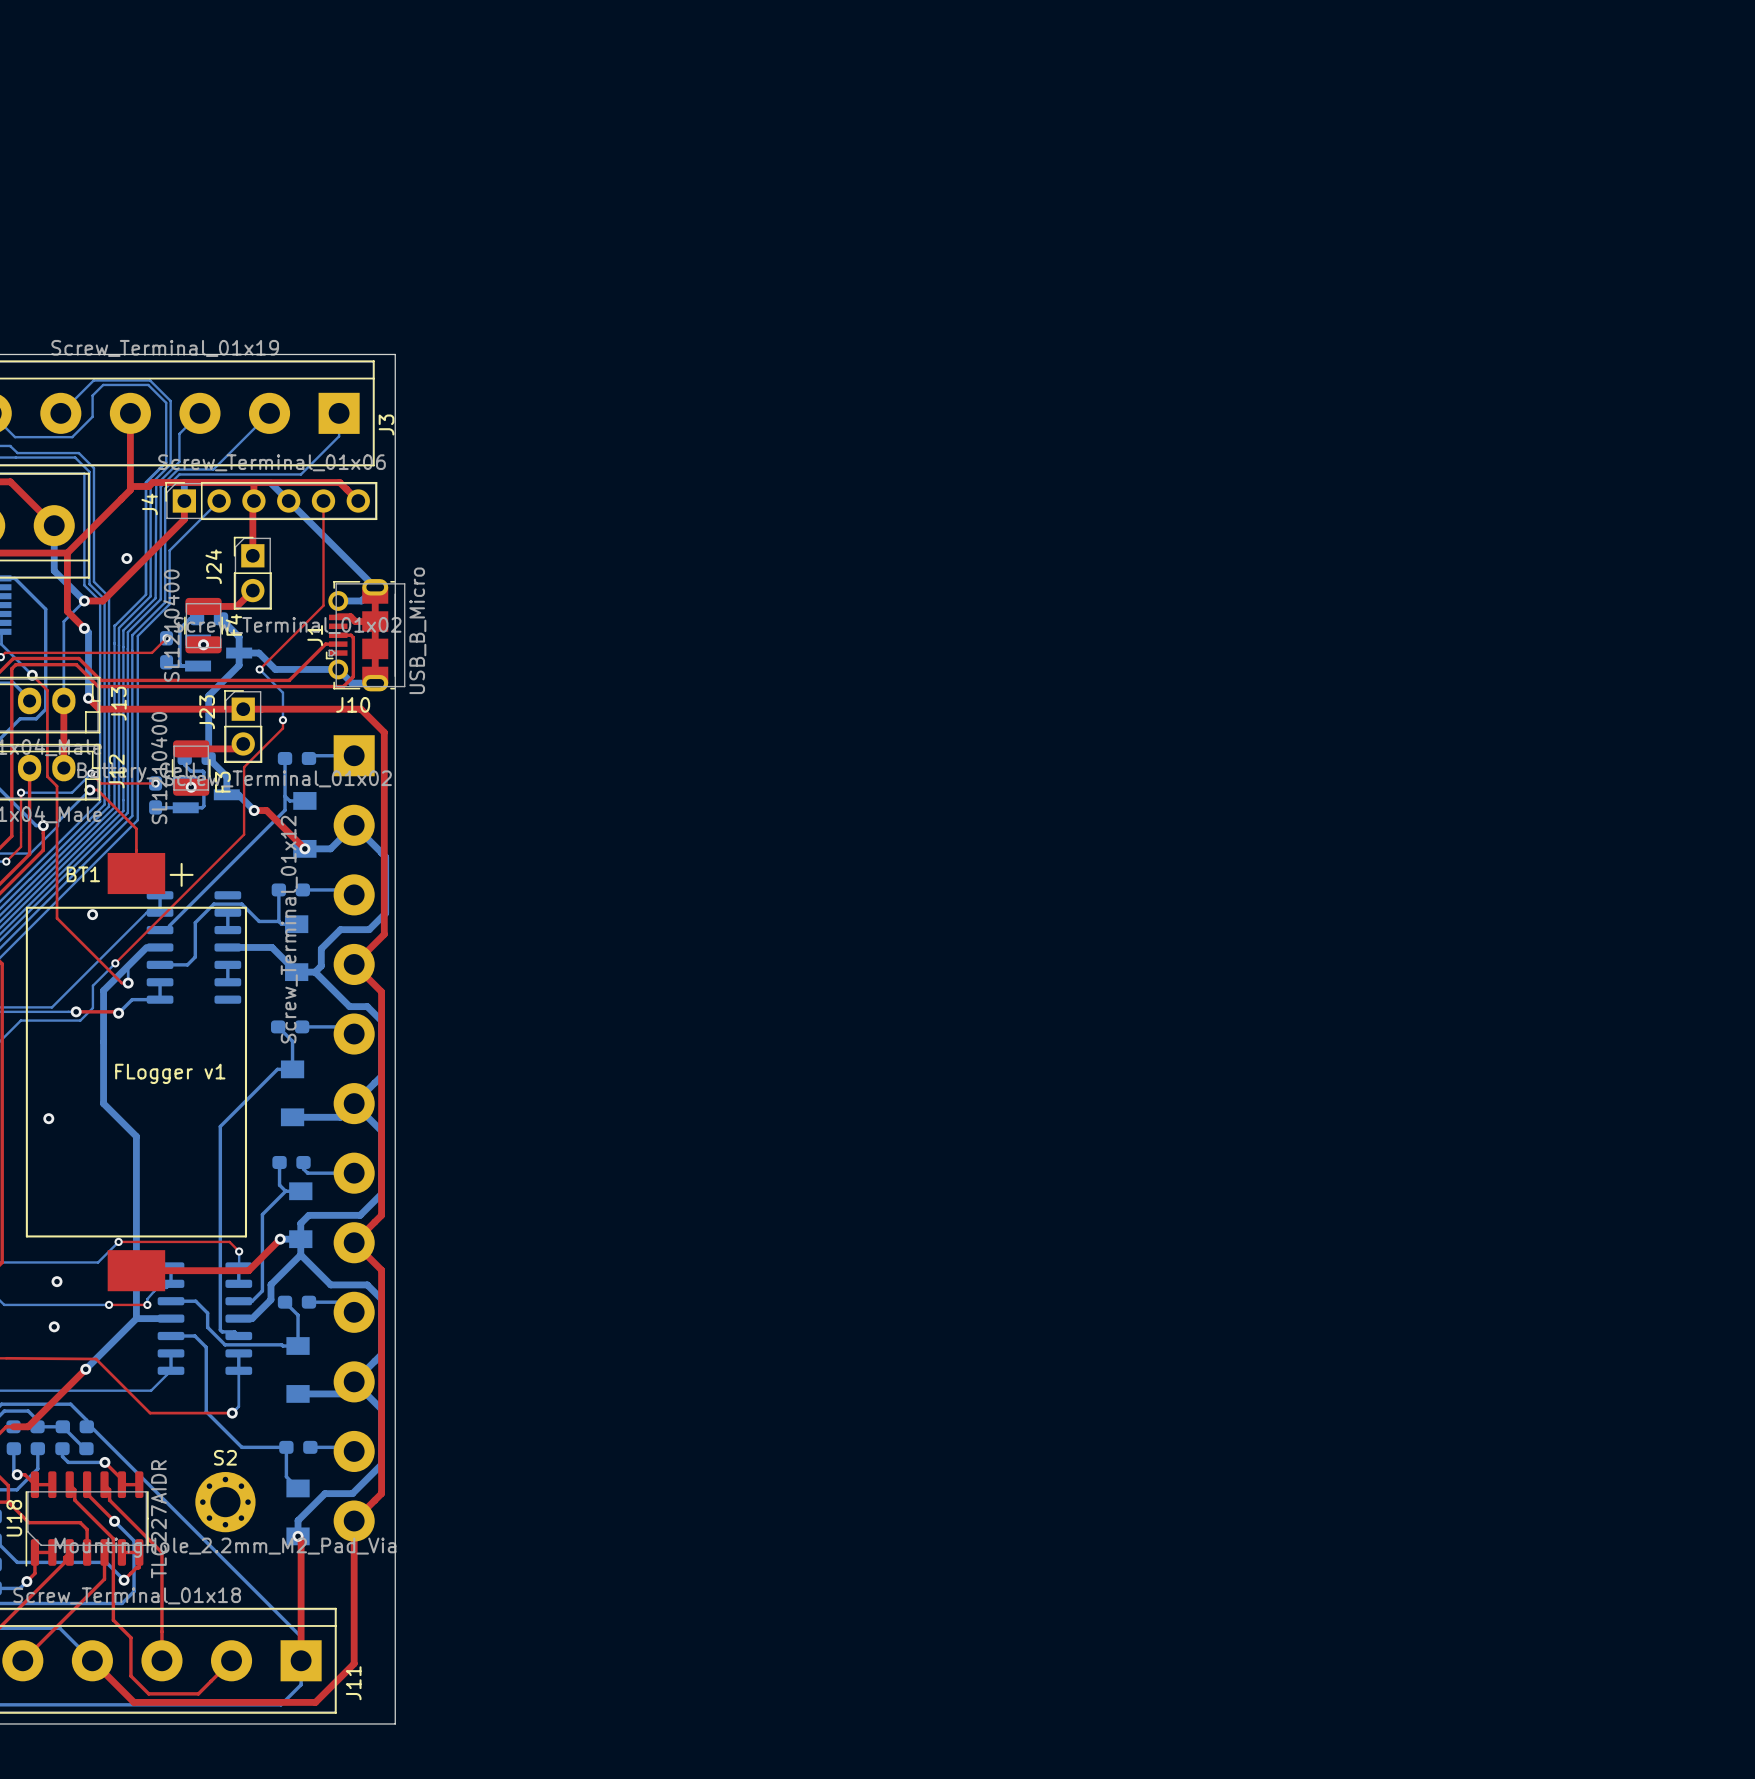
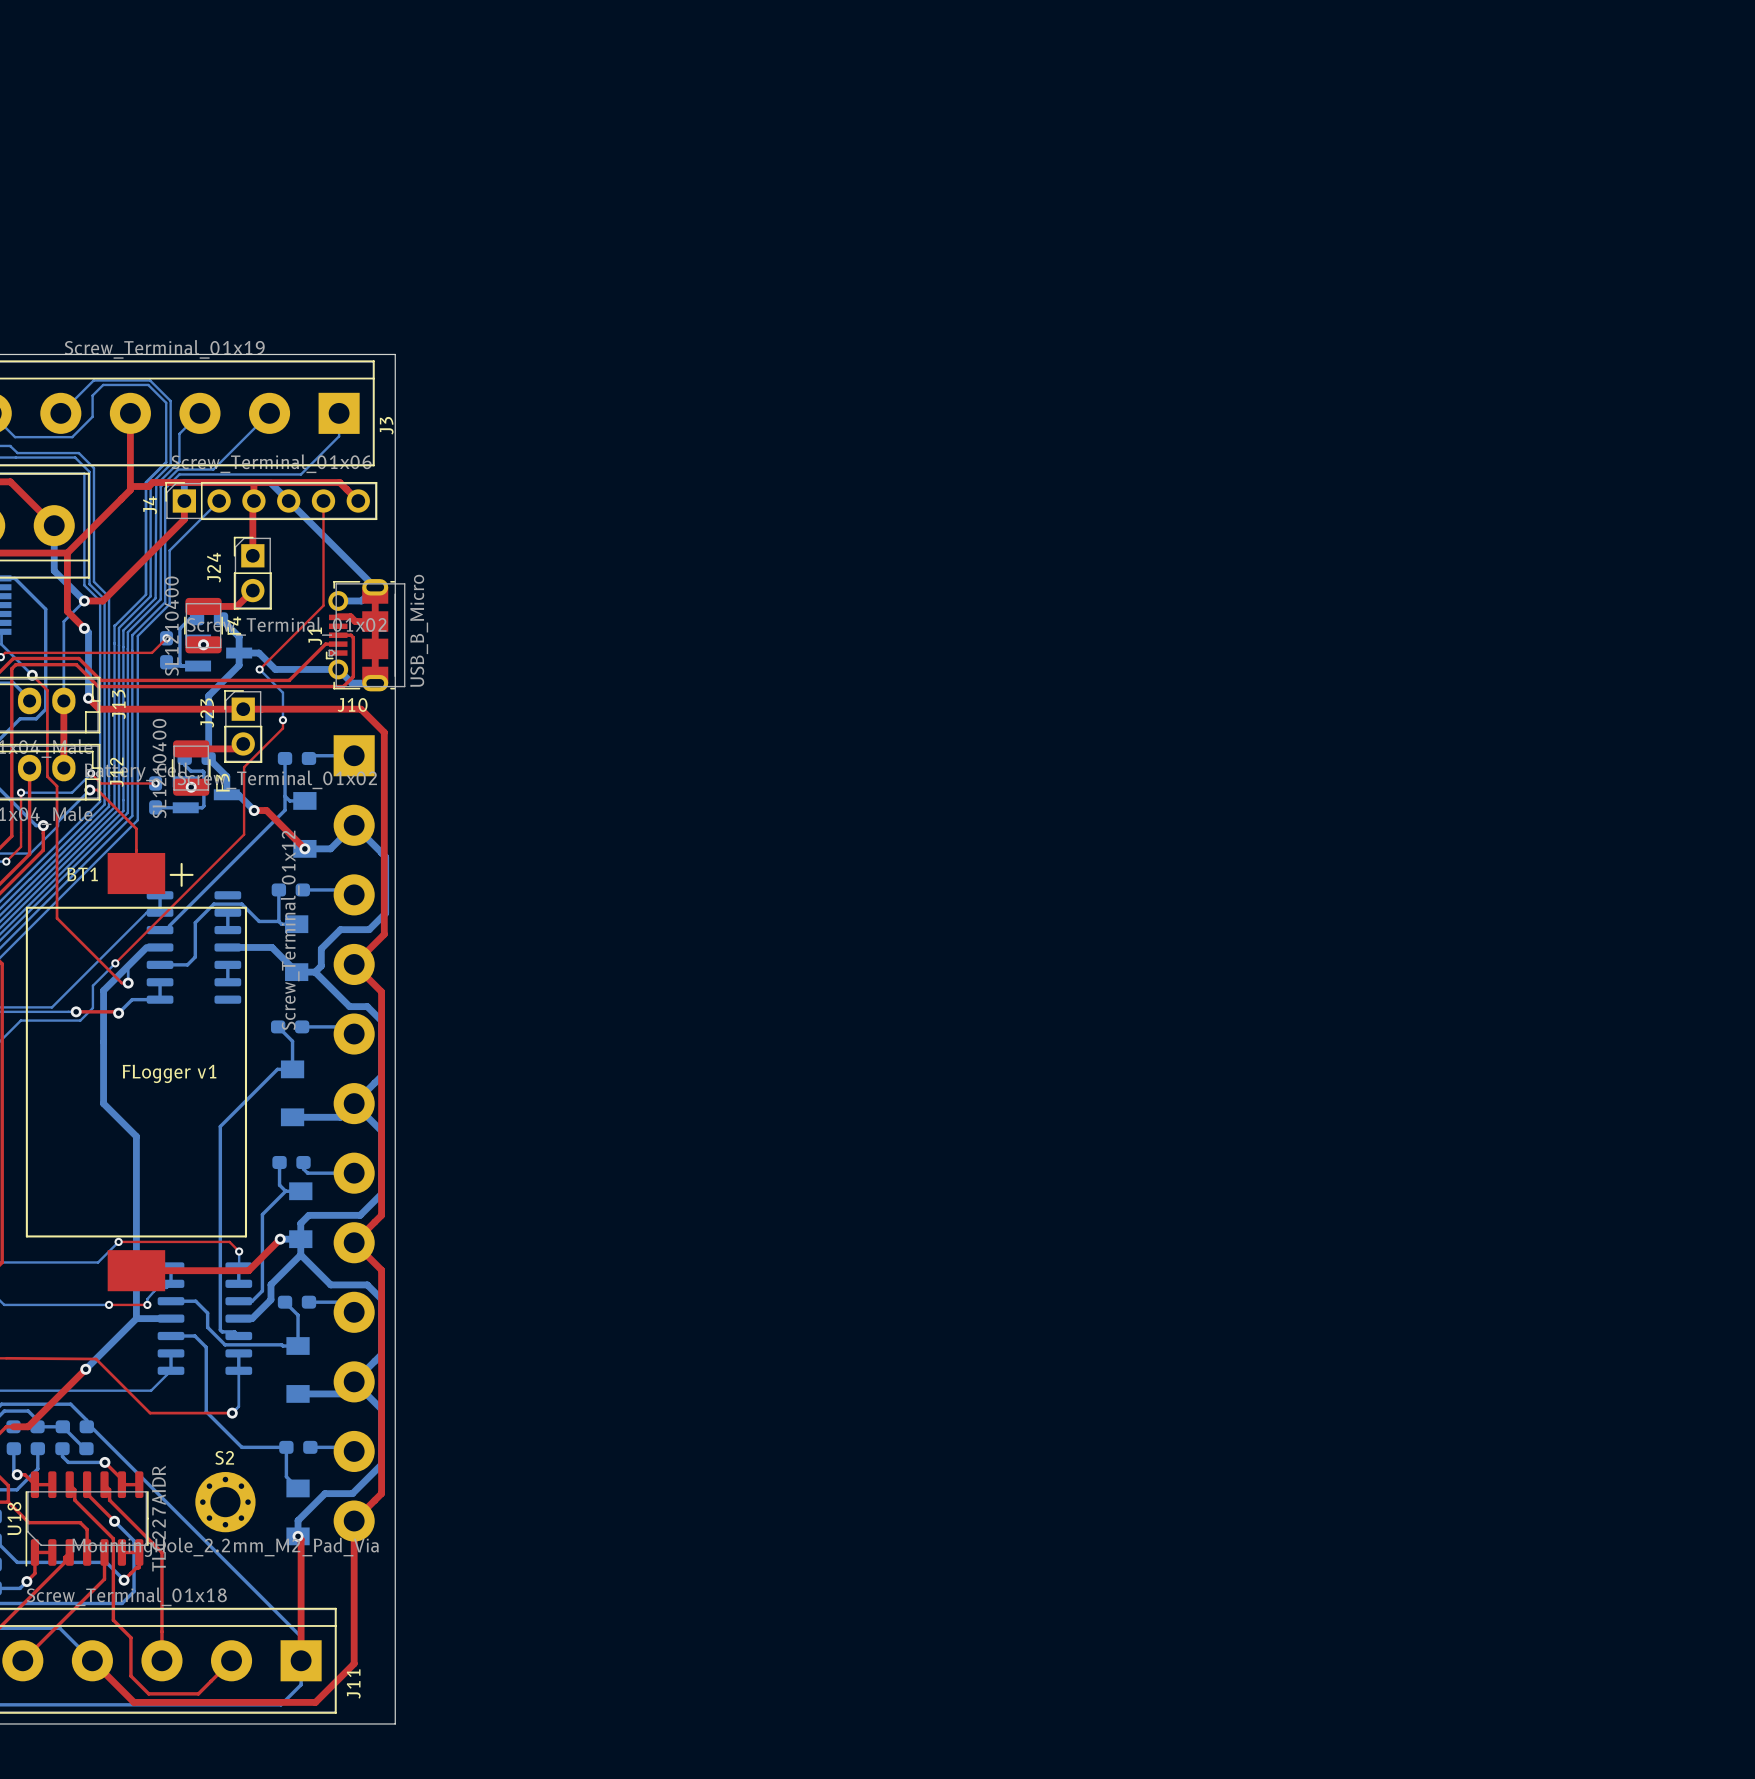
via: (126, 558) -> none
via: (92, 914) -> none
via: (48, 1118) -> none
via: (56, 1281) -> none
via: (54, 1326) -> none

